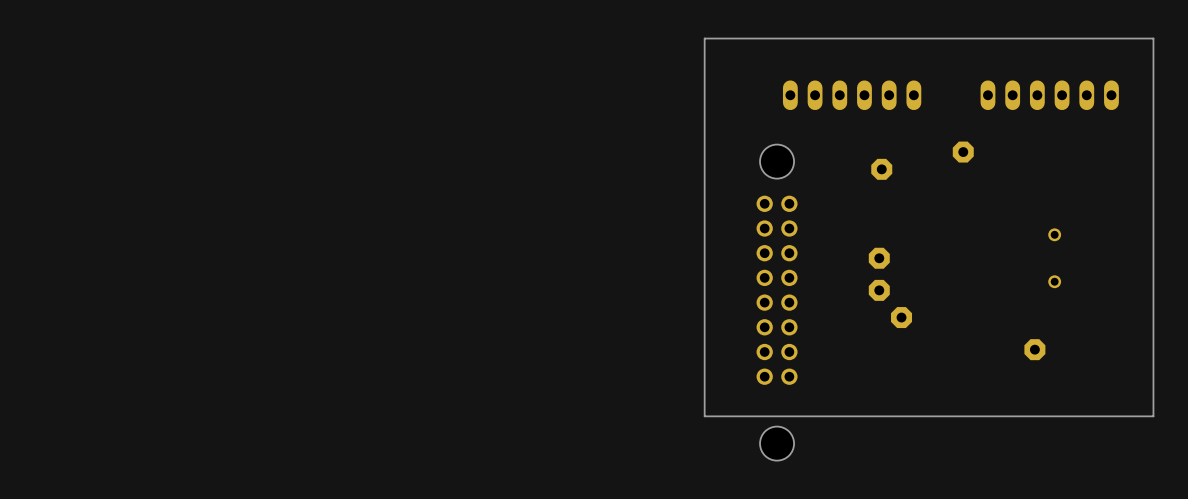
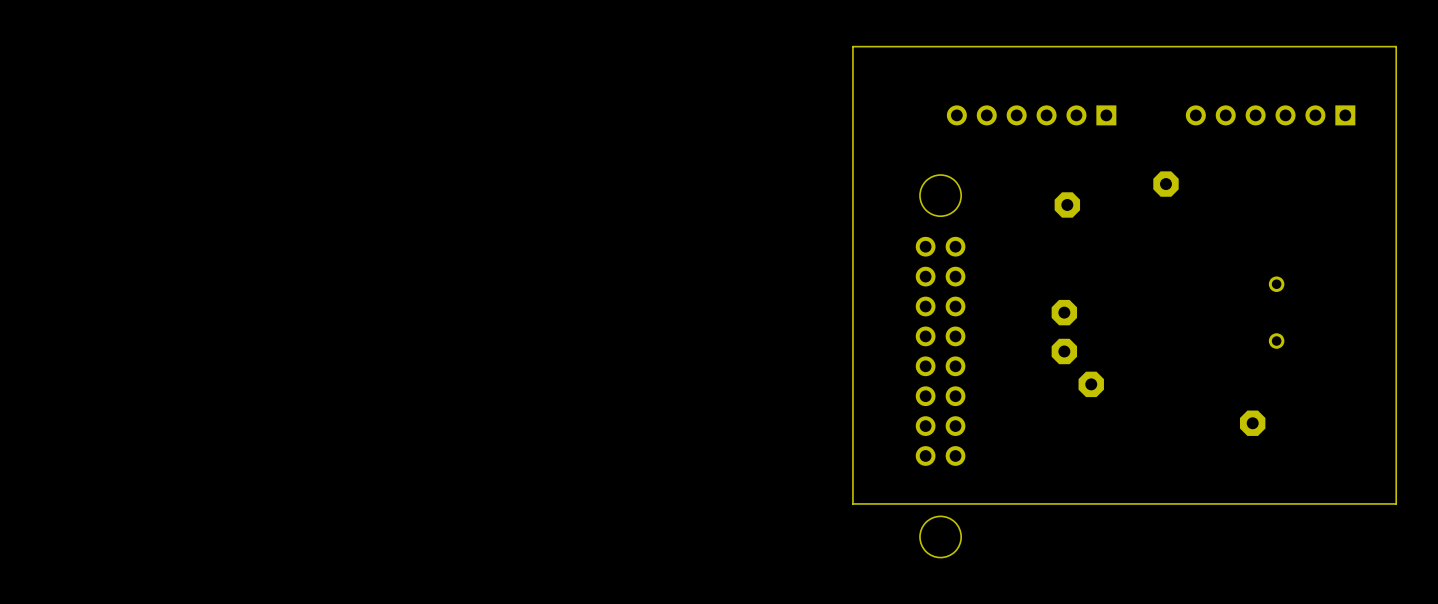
part footprint: [782, 80, 922, 111] -> [946, 105, 1117, 126]
part footprint: [980, 80, 1119, 111] -> [1185, 105, 1356, 126]

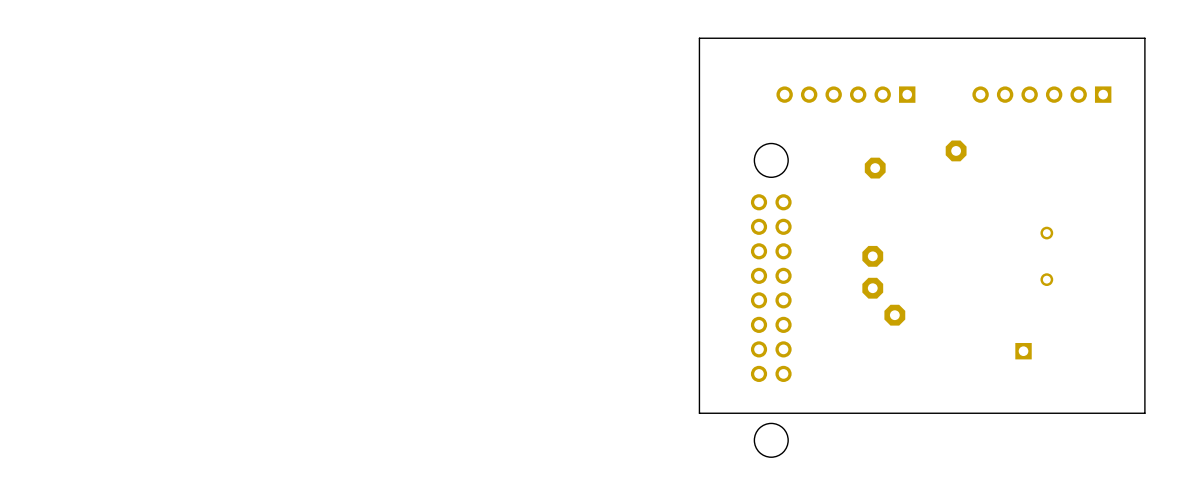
part footprint: [1239, 410, 1266, 436] -> [1015, 342, 1032, 360]

